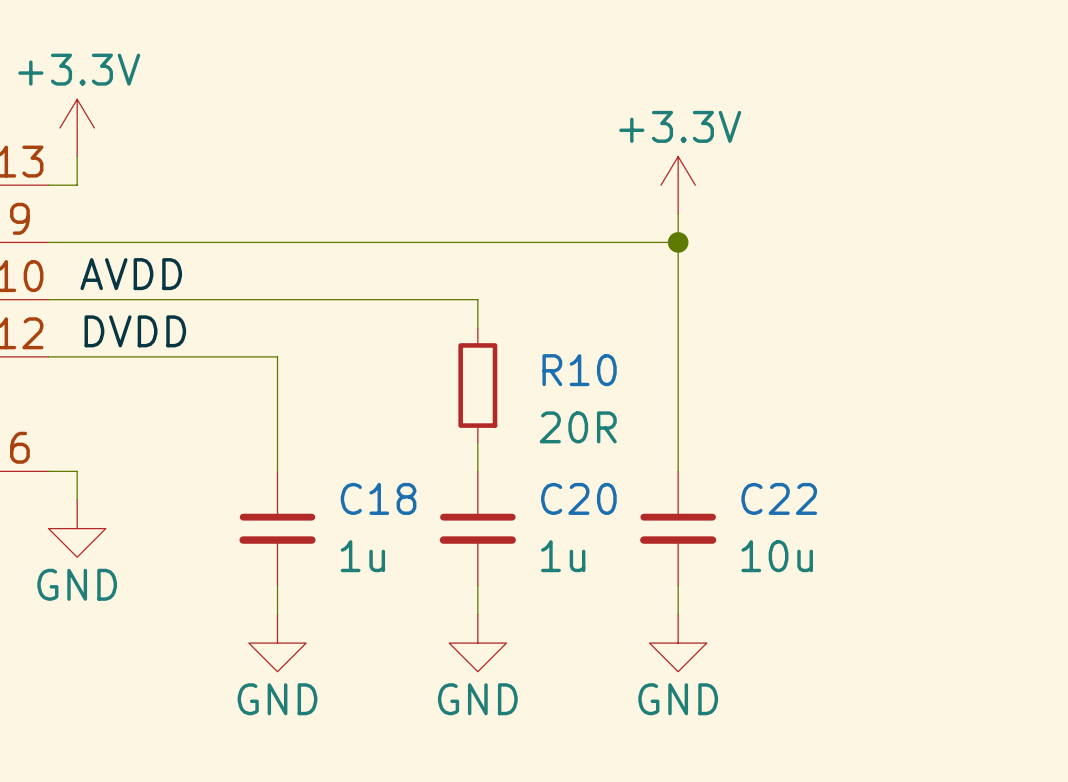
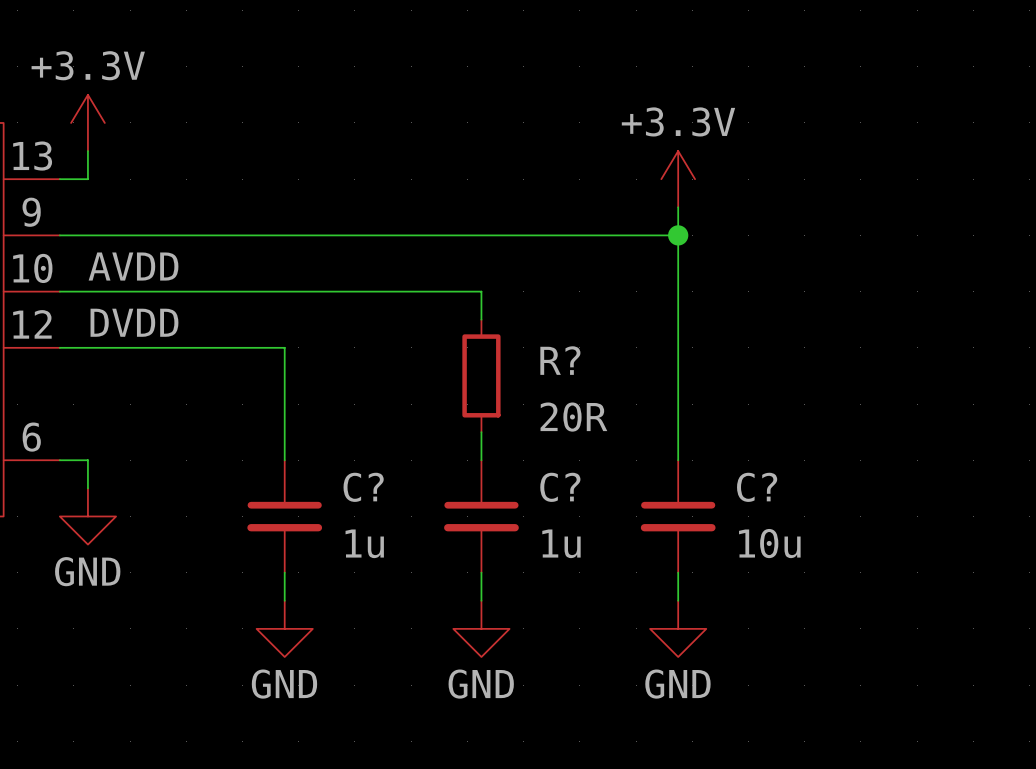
R10 name: R10 (579, 370) -> R? (560, 360)
C18 name: C18 (378, 498) -> C? (363, 487)
C20 name: C20 (578, 498) -> C? (560, 487)
C22 name: C22 (779, 498) -> C? (757, 487)

